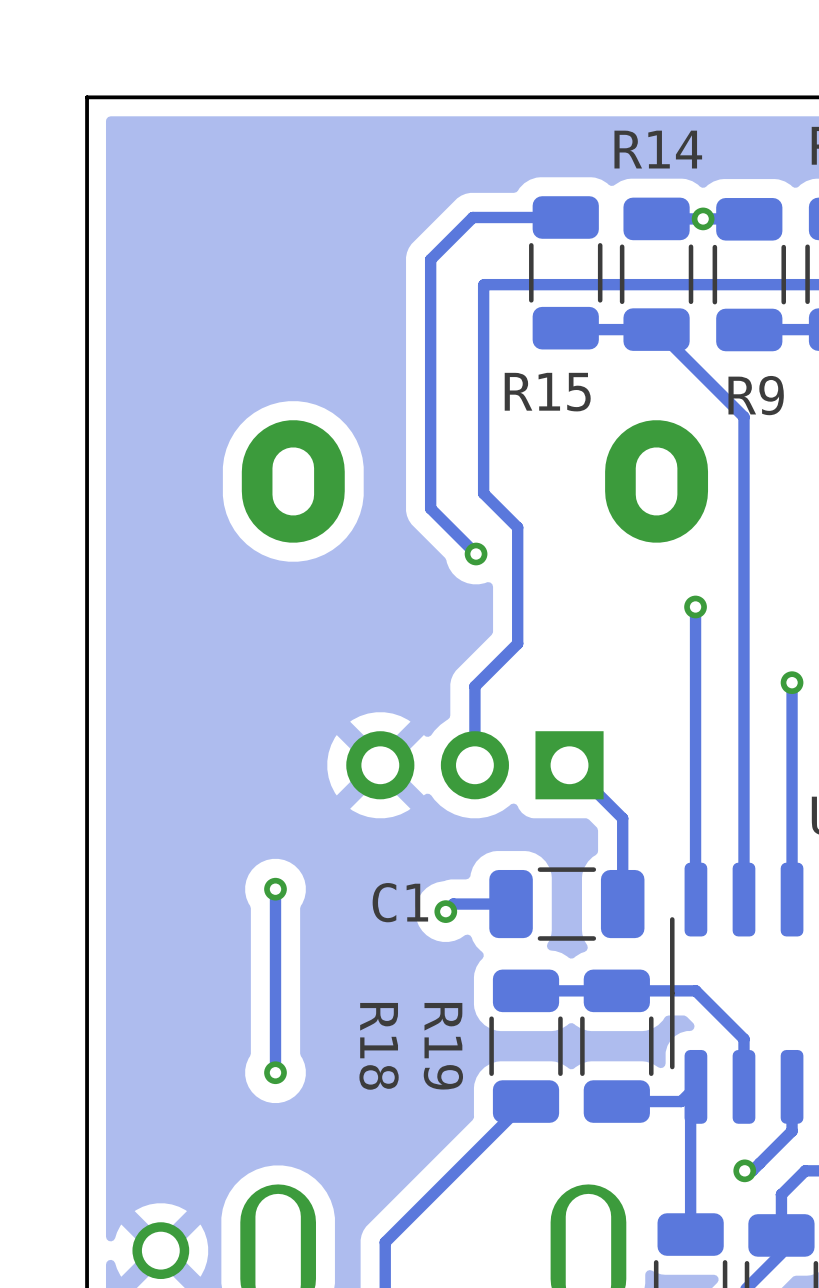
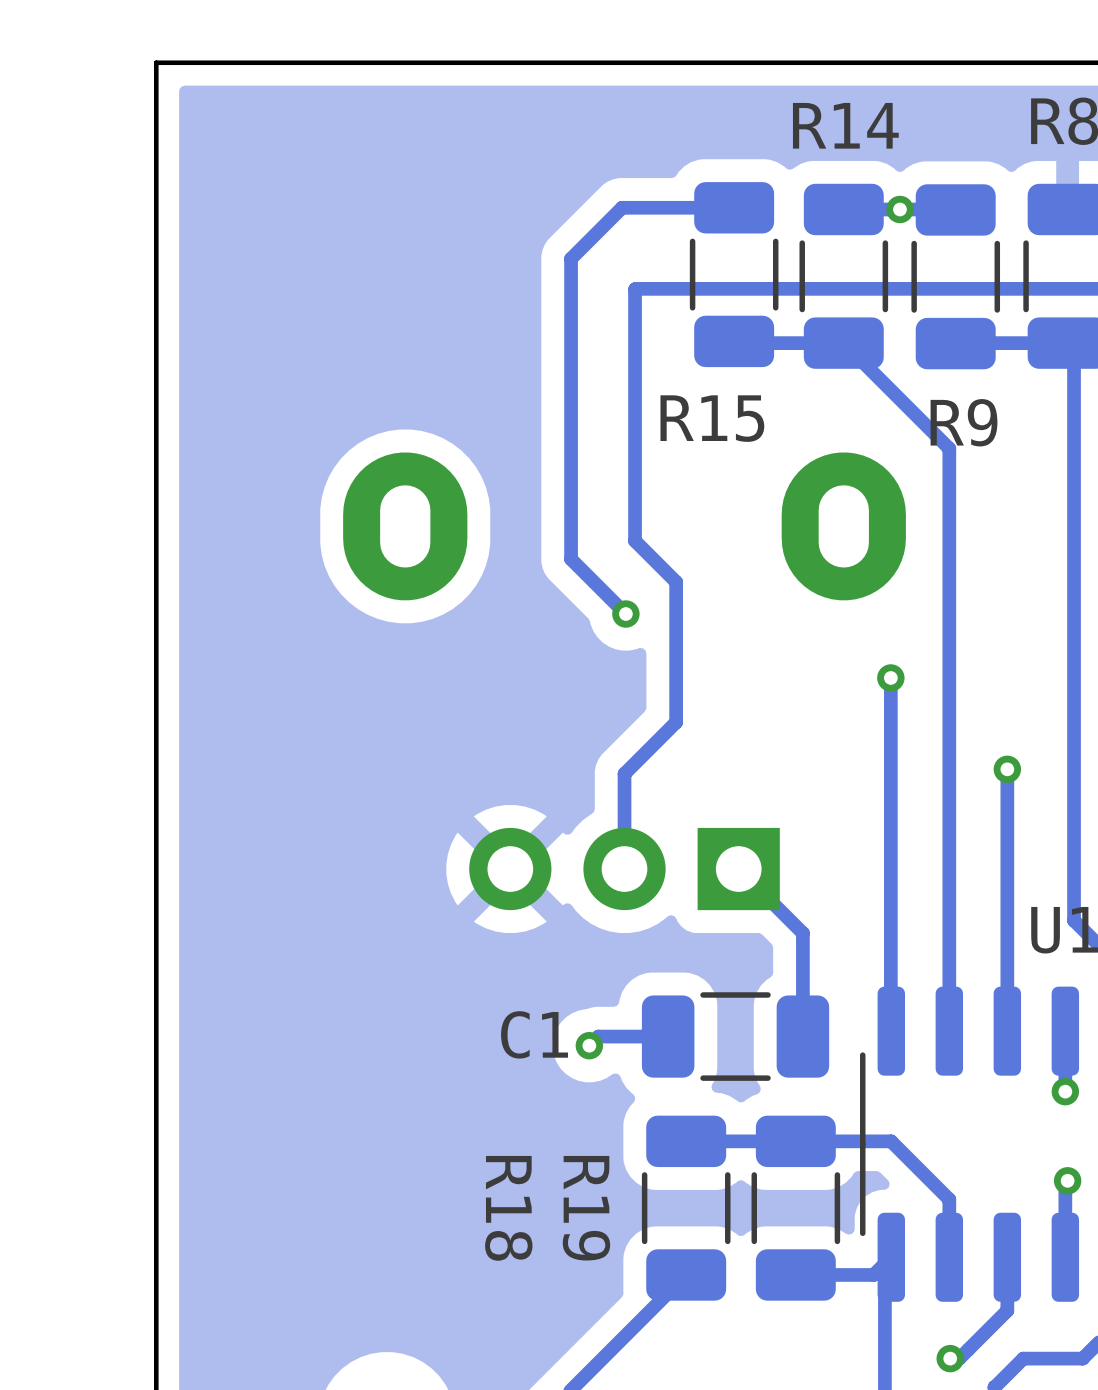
track: (275, 889) (275, 1072) -> none
via: (275, 889) -> none
via: (275, 1072) -> none

